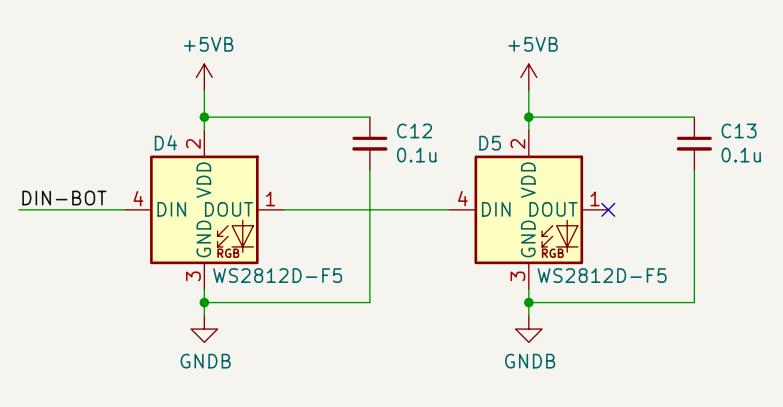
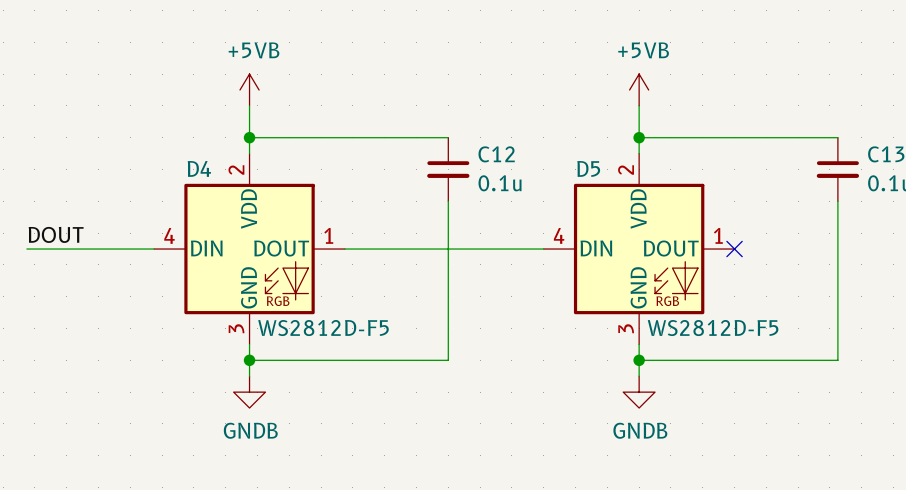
label: DIN-BOT (64, 198) -> DOUT (56, 234)

